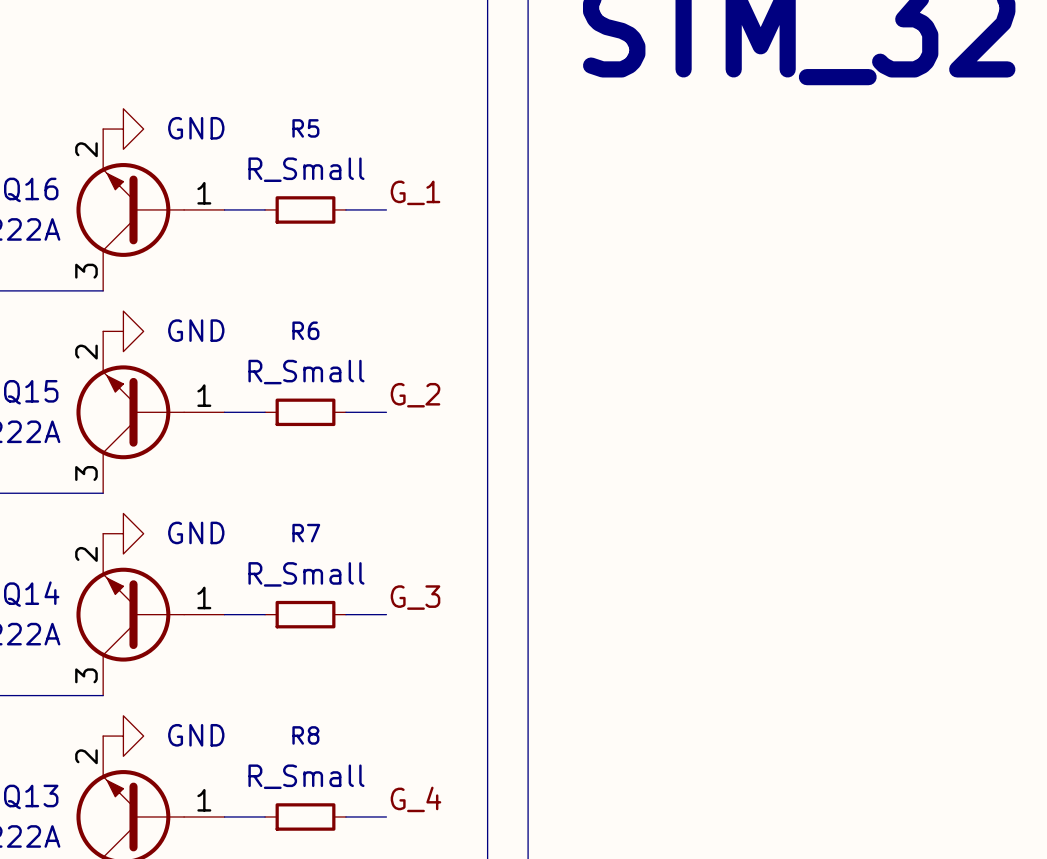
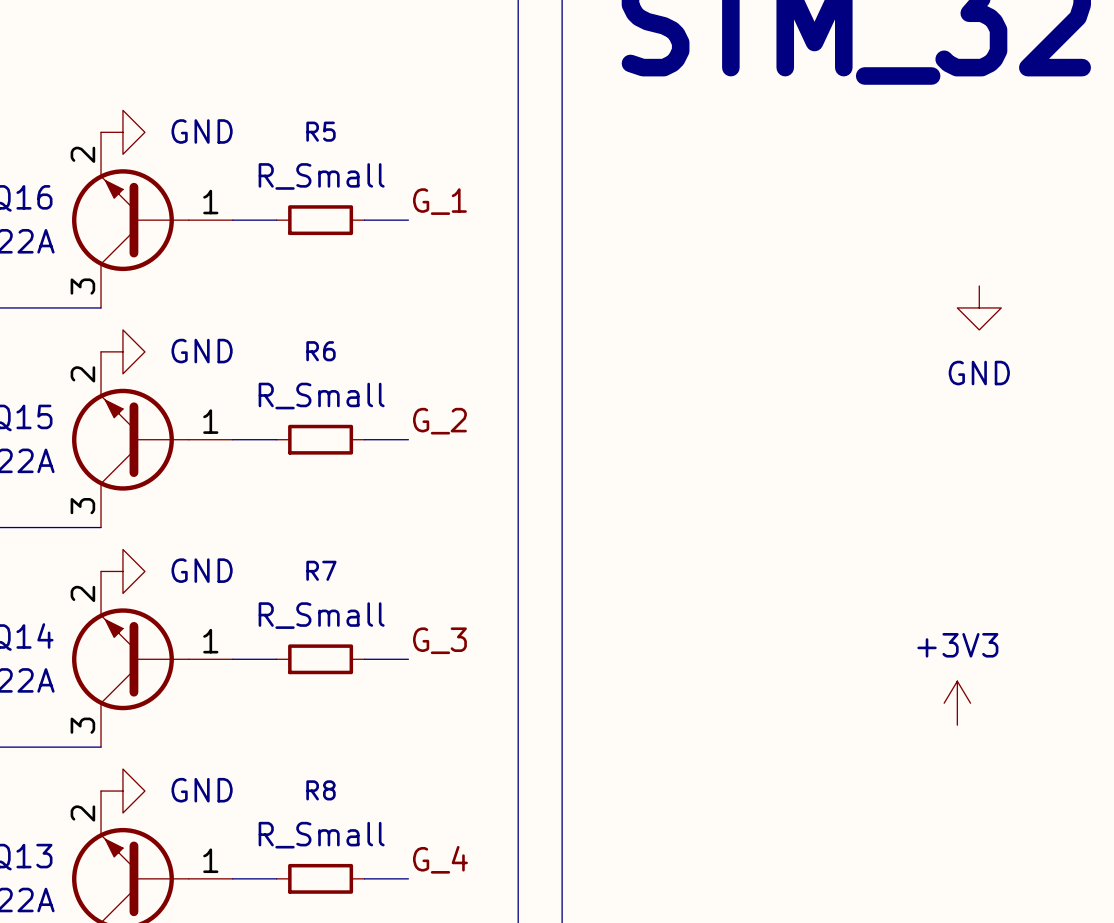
power symbol: none -> GND (979, 307)
power symbol: none -> +3V3 (957, 703)

